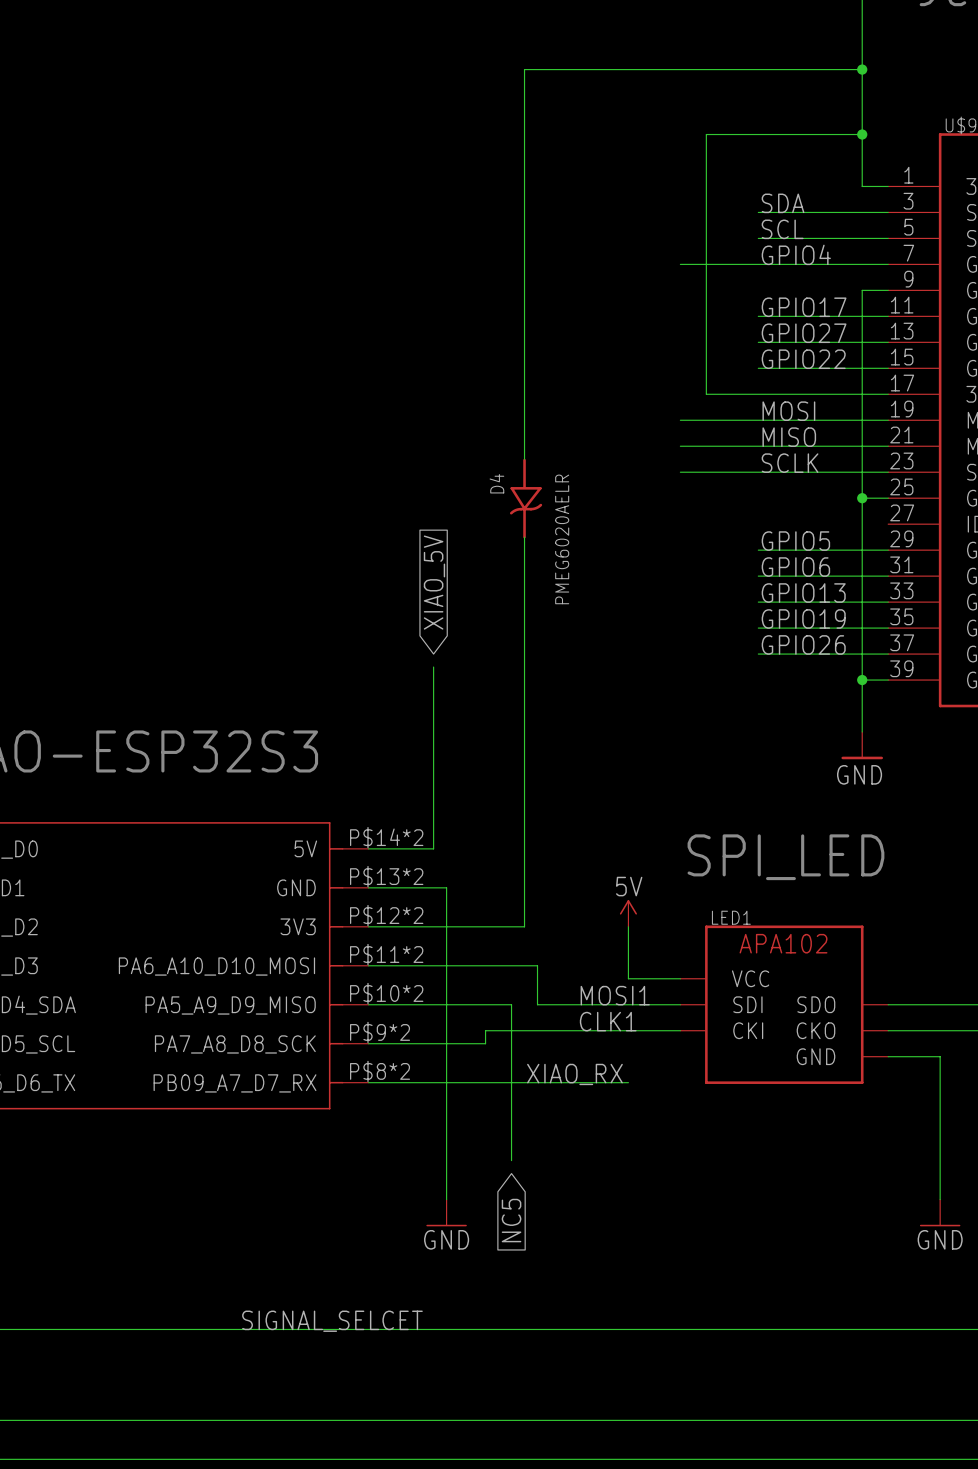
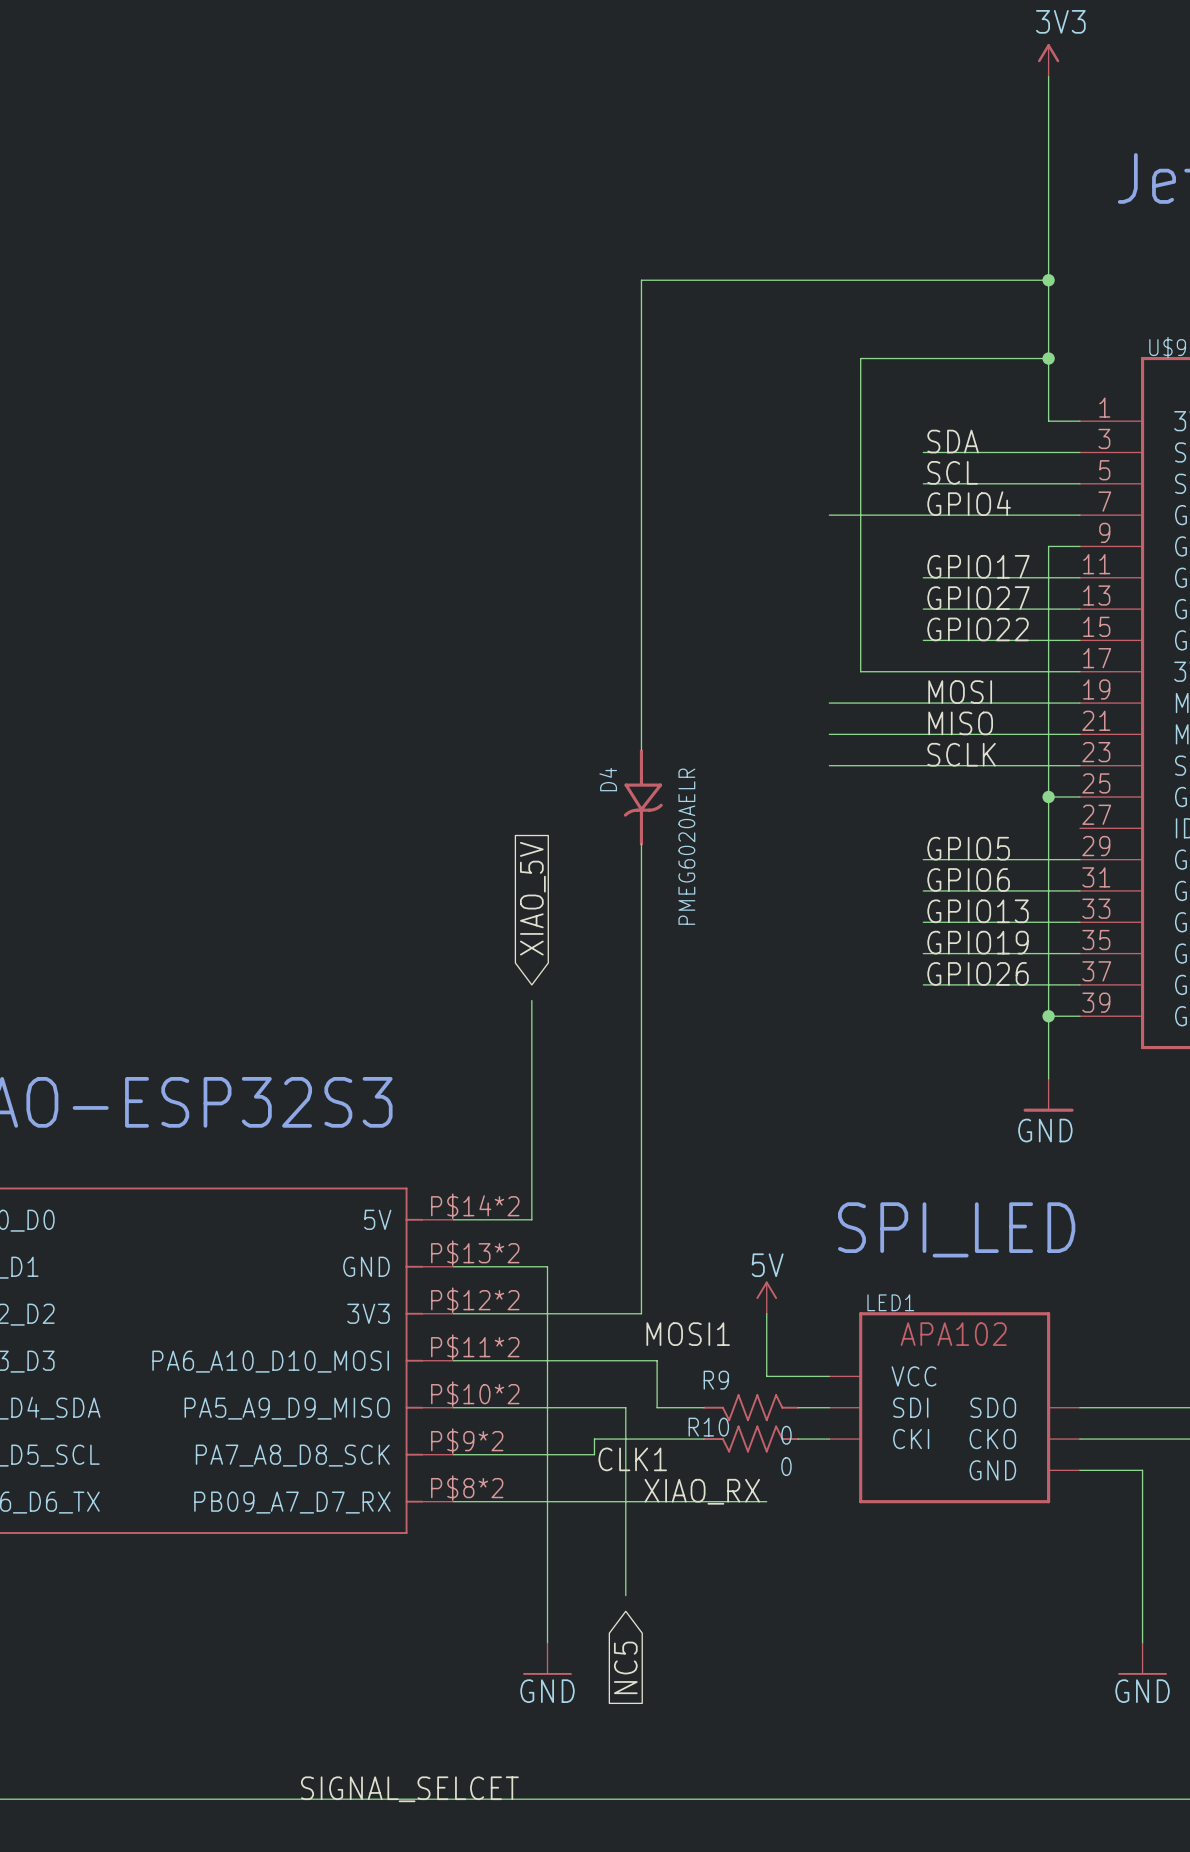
label position: MOSI1 (615, 995) -> MOSI1 (688, 1334)
wire: (576, 1004) (654, 1004) -> none
R9: none -> 0 (751, 1407)
label position: CLK1 (608, 1021) -> CLK1 (632, 1459)
wire: (576, 1030) (654, 1030) -> none
R10: none -> 0 (751, 1439)

